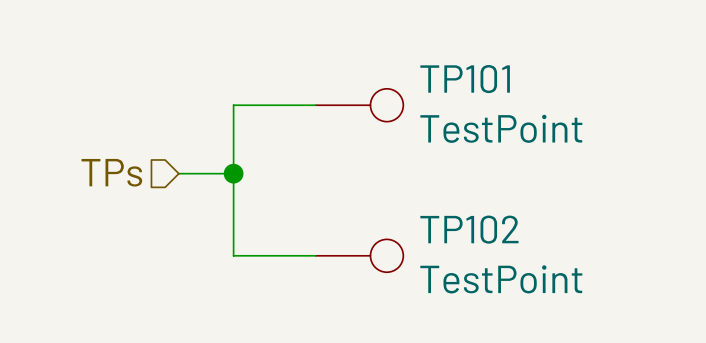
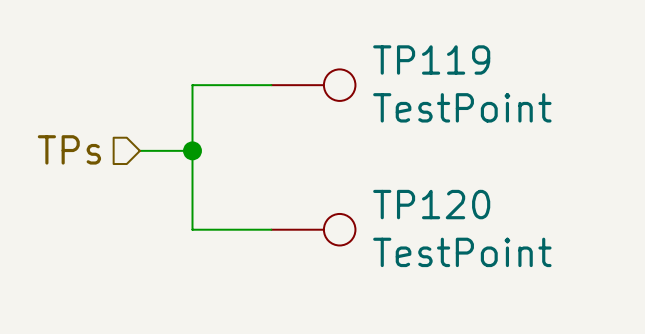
TP101 name: TP101 (465, 79) -> TP119 (431, 59)
TP102 name: TP102 (469, 229) -> TP120 (431, 204)

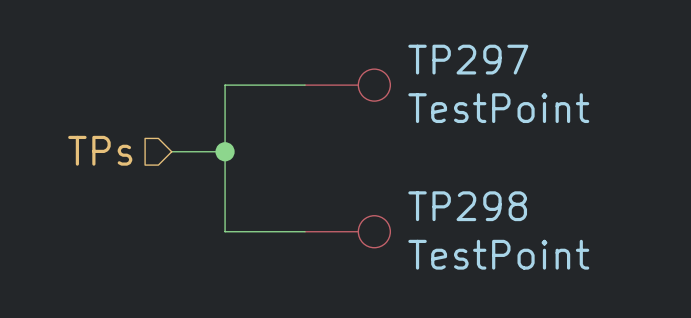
TP119 name: TP119 (431, 59) -> TP297 (468, 59)
TP120 name: TP120 (431, 204) -> TP298 (467, 206)

